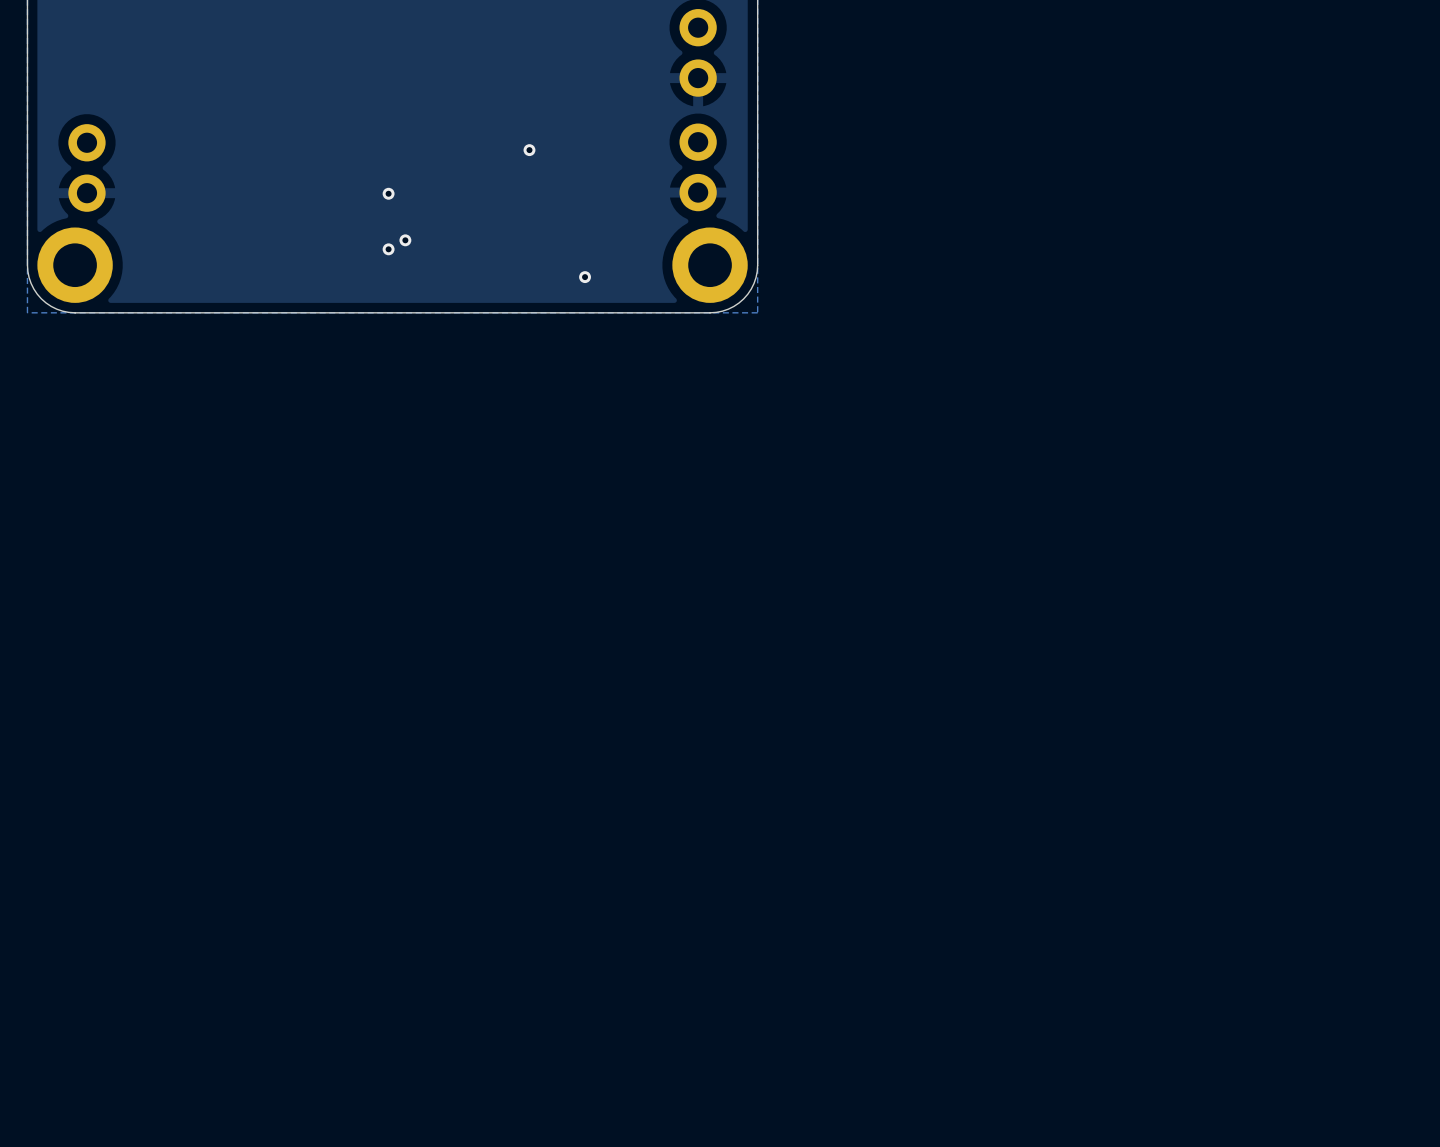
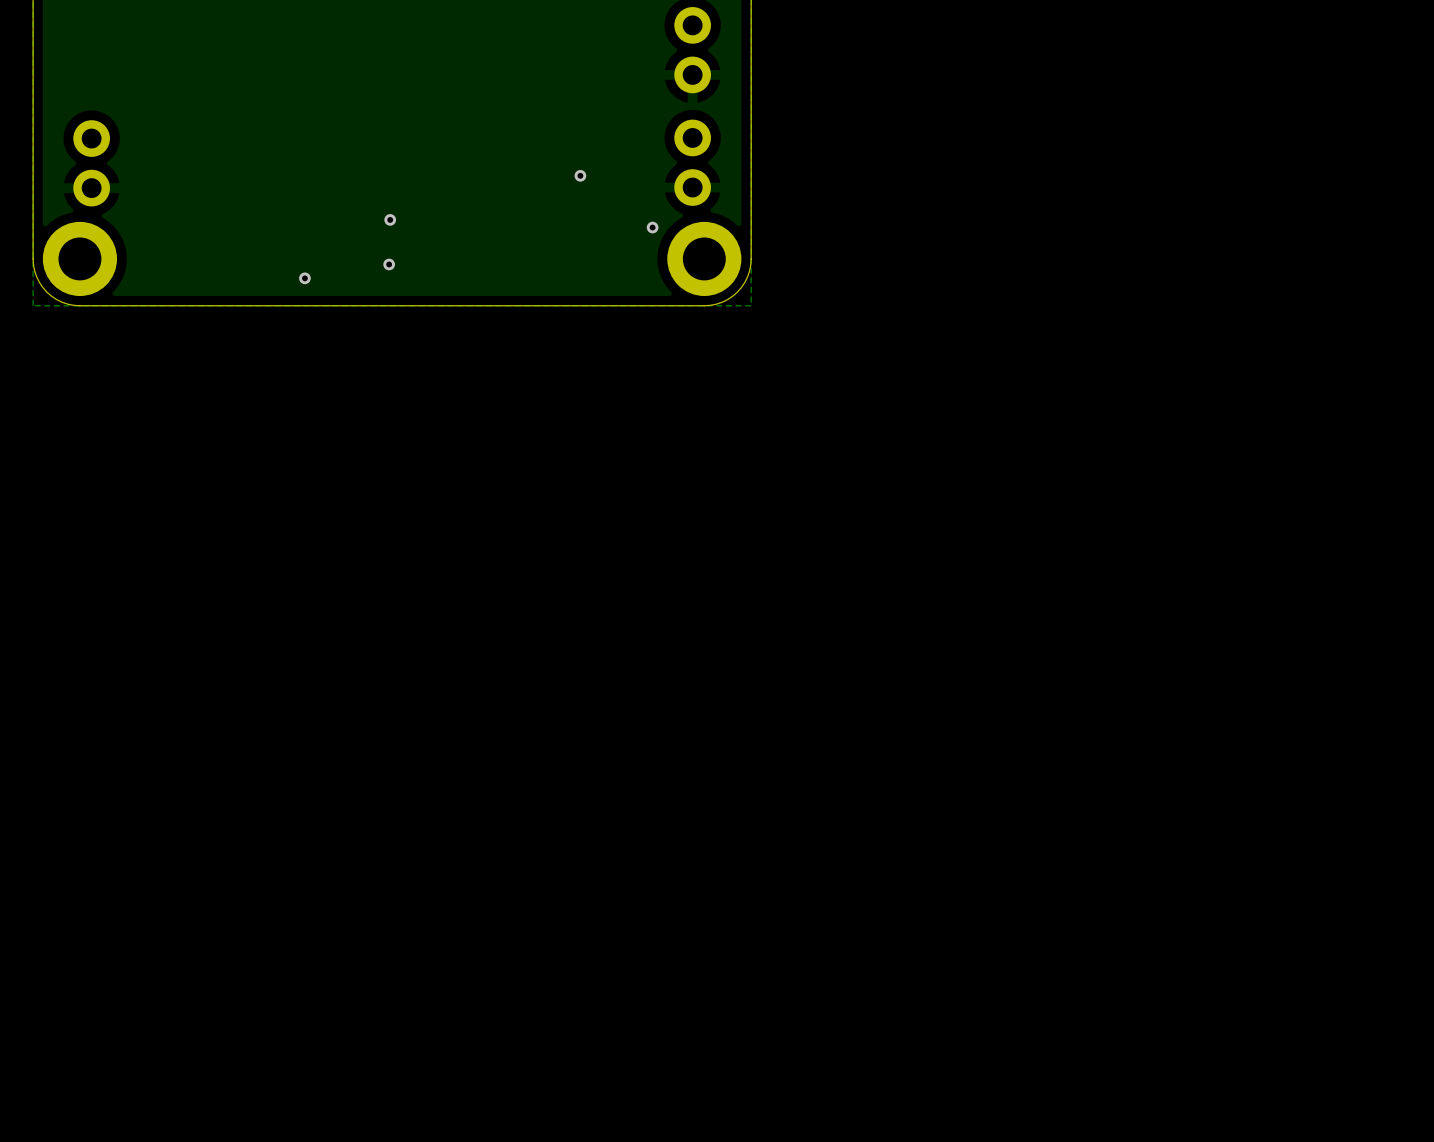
via: (529, 150) -> none
via: none -> (580, 175)
via: (388, 193) -> none
via: none -> (390, 219)
via: none -> (652, 227)
via: (405, 240) -> none
via: (388, 249) -> none
via: none -> (389, 264)
via: (585, 277) -> none
via: none -> (304, 278)

